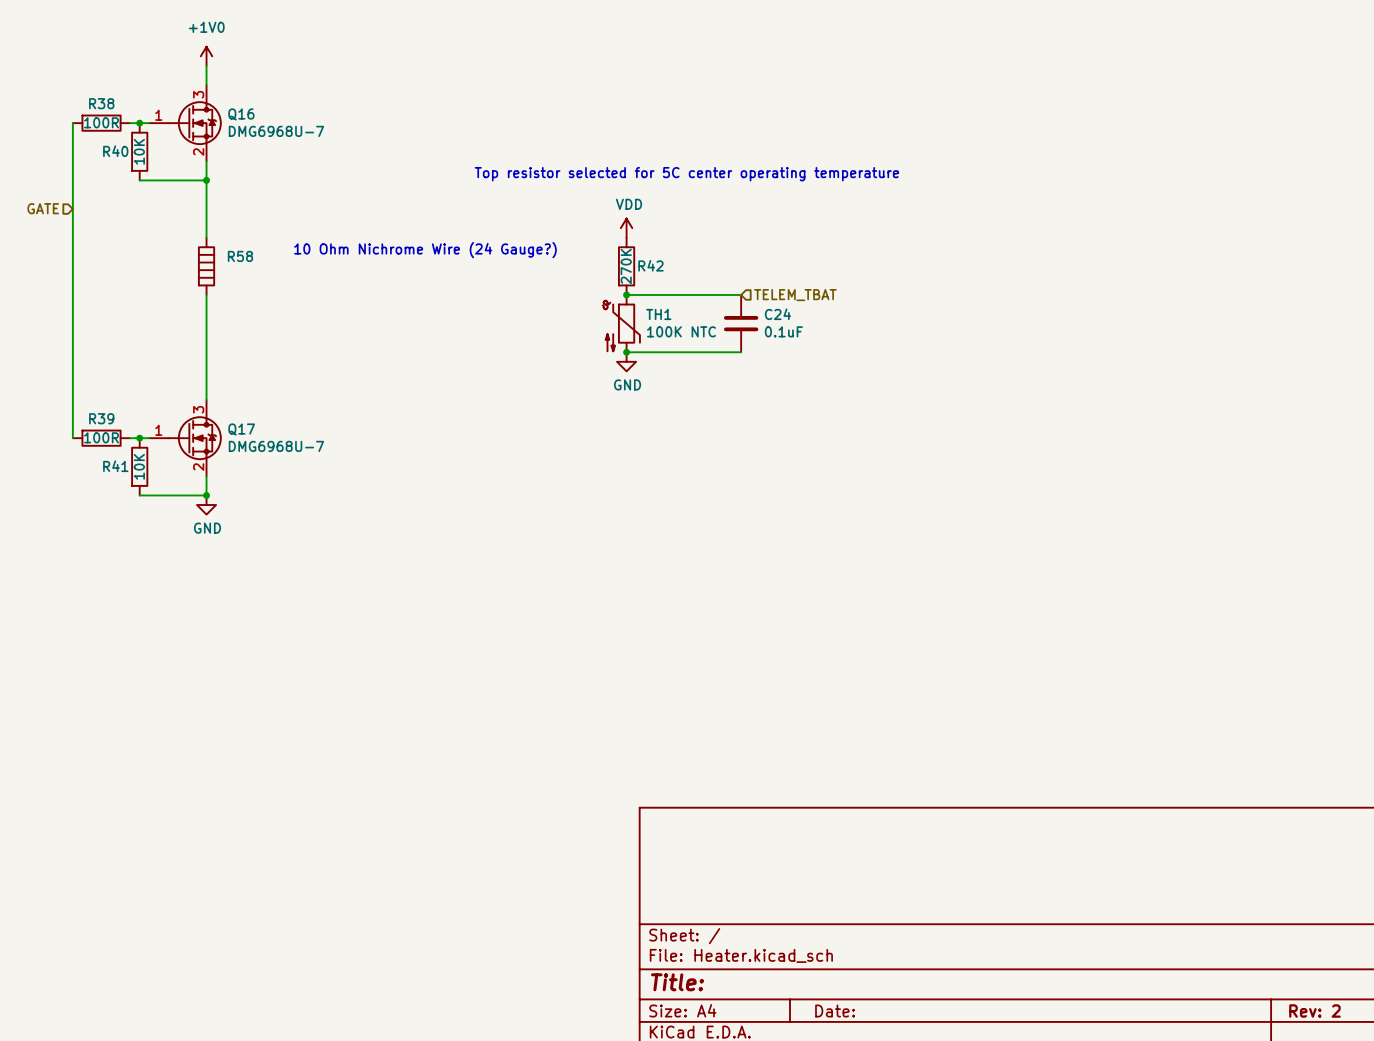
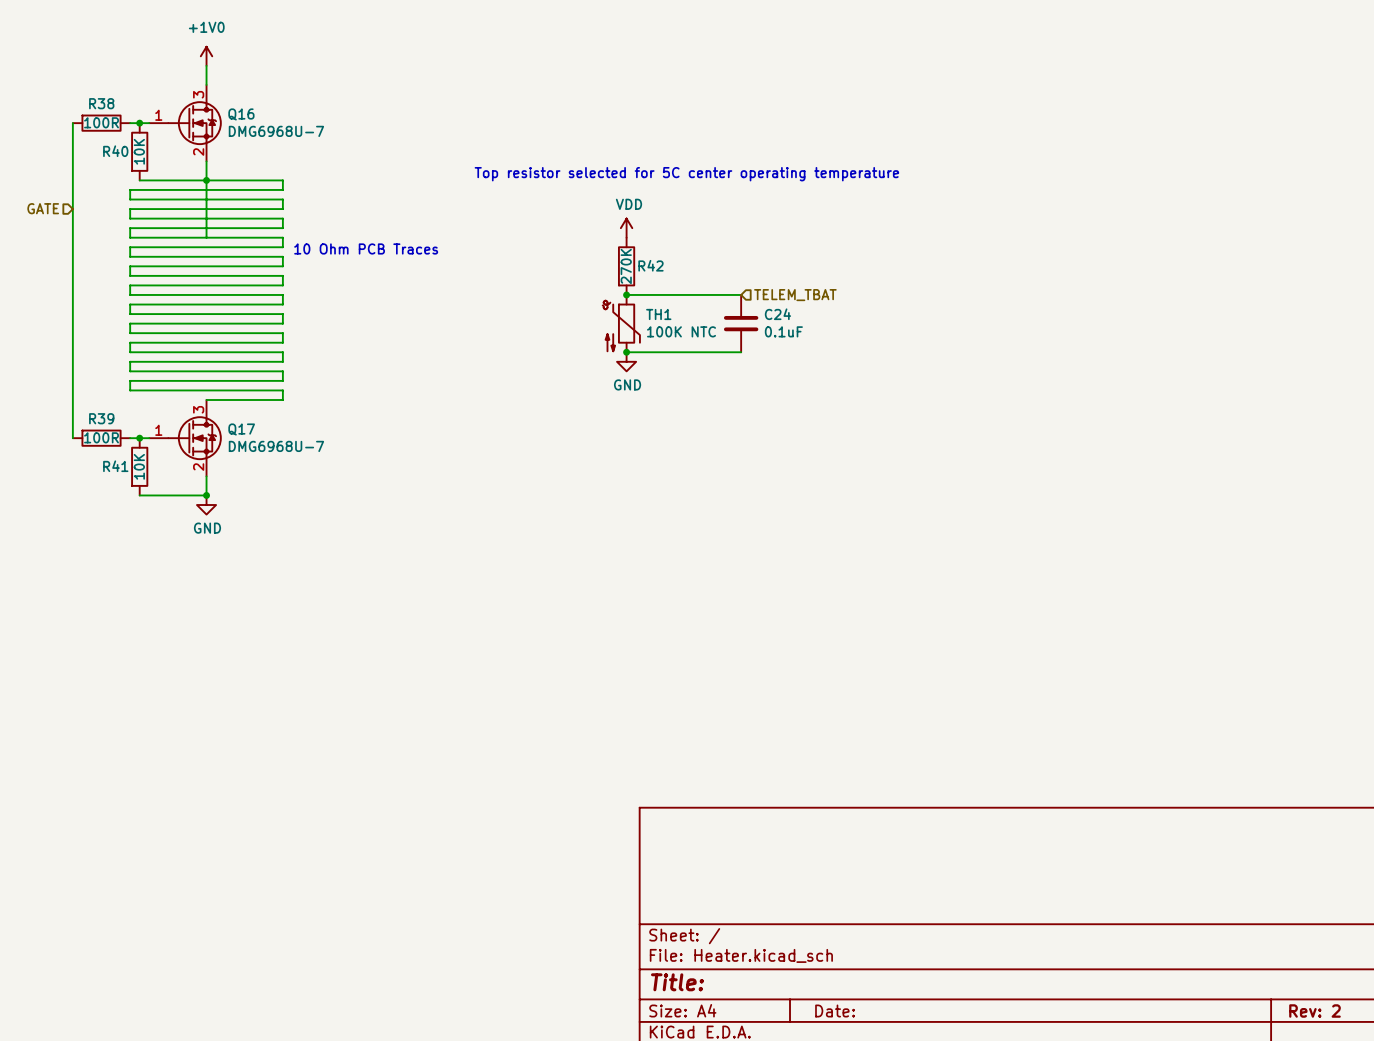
text: 10 Ohm Nichrome Wire (24 Gauge?) (425, 250) -> 10 Ohm PCB Traces (366, 248)
R58: (206, 266) -> none
wire: (206, 294) (206, 399) -> (206, 180) (282, 180) (282, 189) (130, 189) (130, 199) (282, 199) (282, 209) (130, 209) (130, 218) (282, 218) (282, 228) (130, 228) (130, 237) (282, 237) (282, 247) (130, 247) (130, 256) (282, 256) (282, 266) (130, 266) (130, 275) (282, 275) (282, 285) (130, 285) (130, 294) (282, 294) (282, 304) (130, 304) (130, 314) (282, 314) (282, 323) (130, 323) (130, 333) (282, 333) (282, 342) (130, 342) (130, 352) (282, 352) (282, 361) (130, 361) (130, 371) (282, 371) (282, 380) (130, 380) (130, 390) (282, 390) (282, 399) (206, 399)

